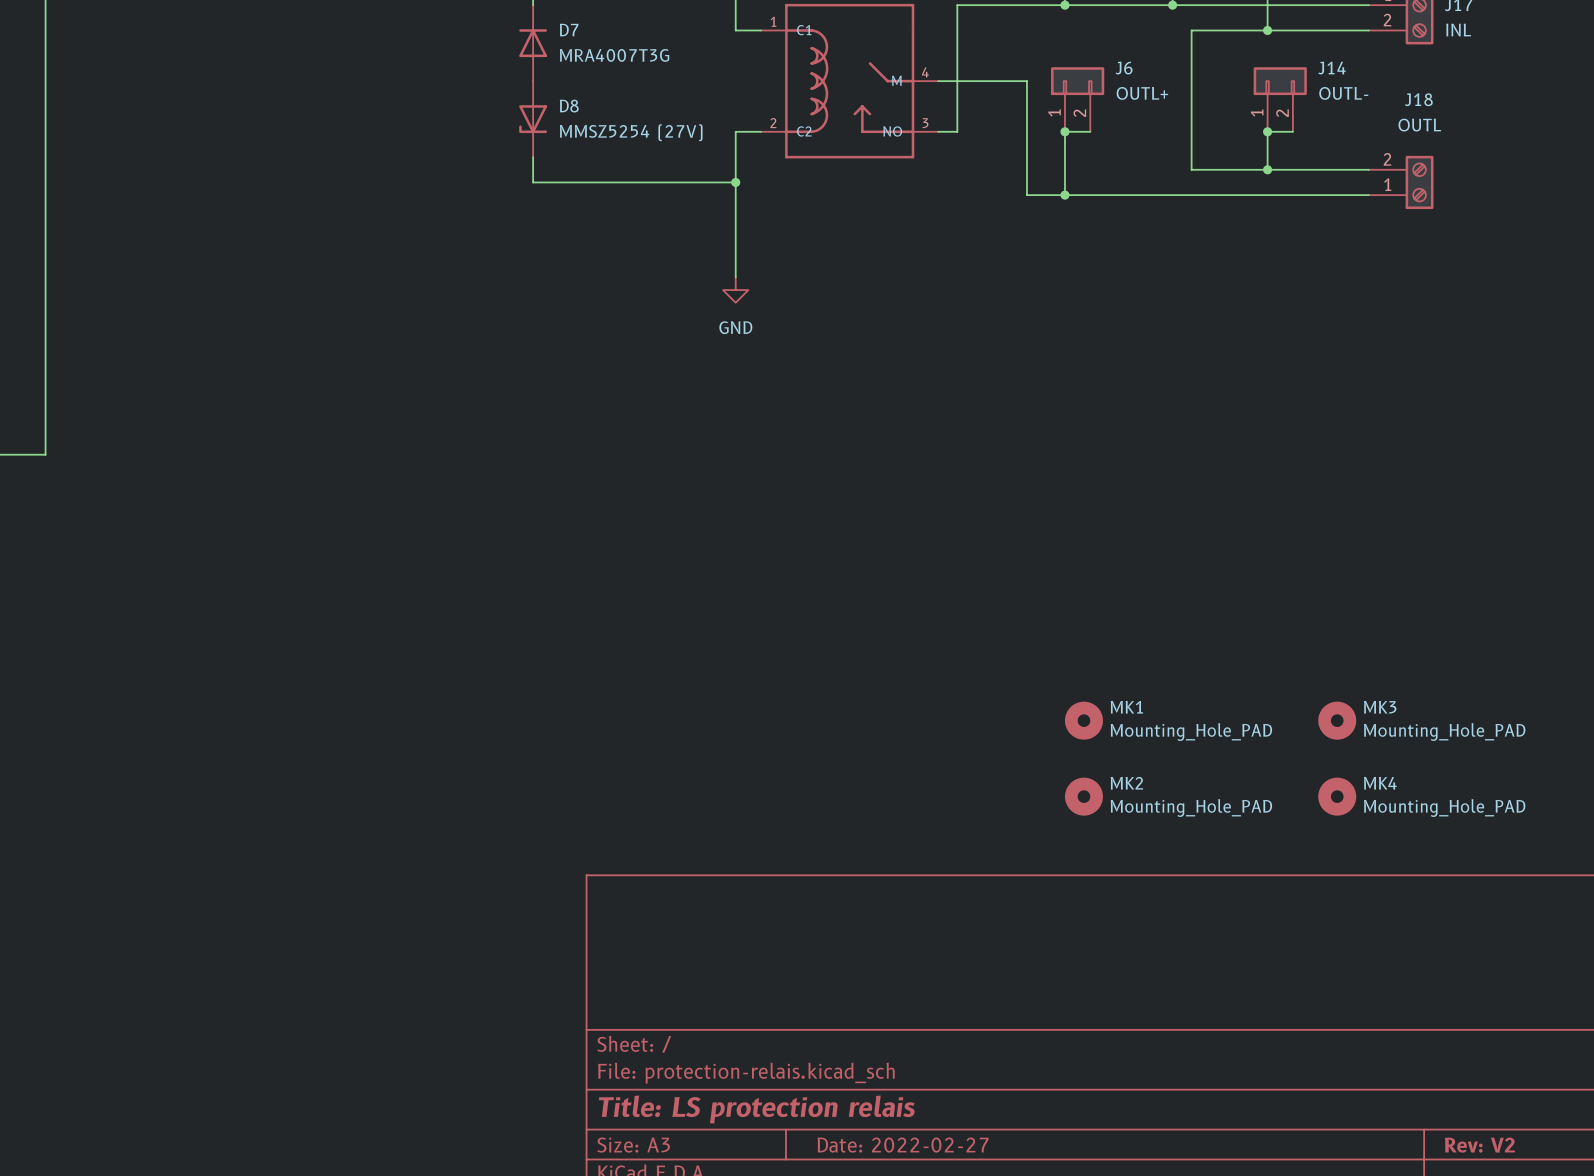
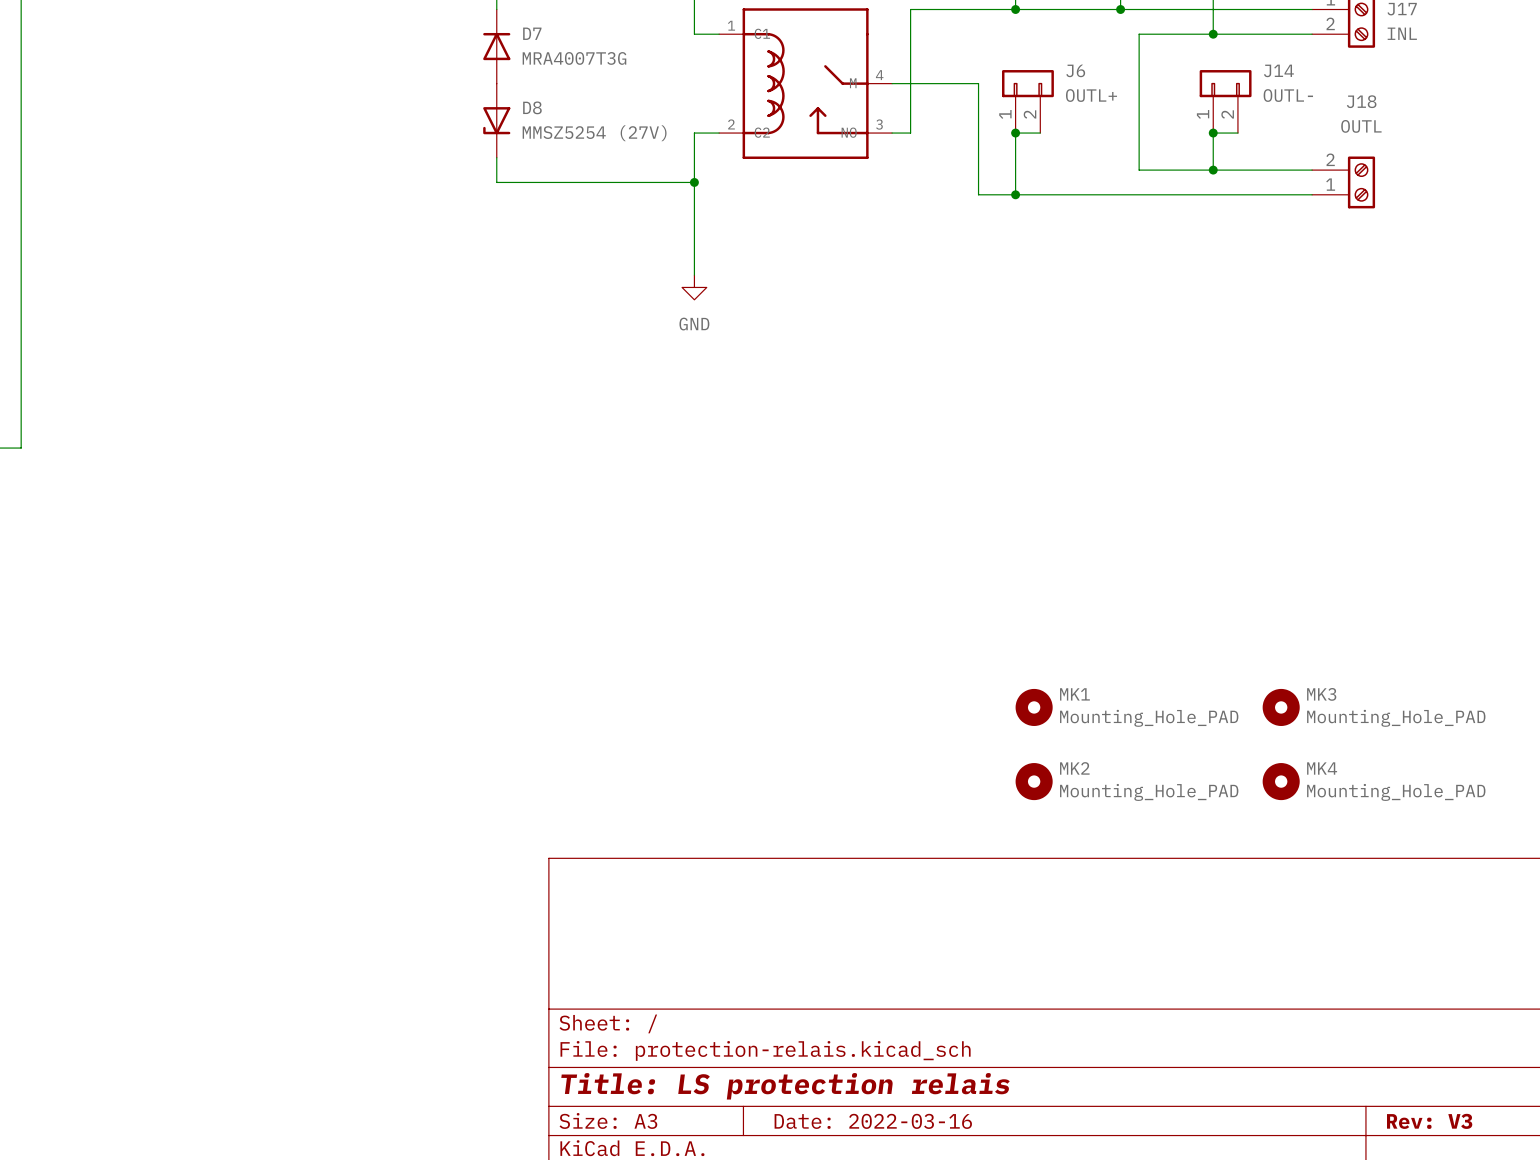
title block: Date: 2022-02-27 (903, 1145) -> Date: 2022-03-16 (873, 1121)
title block: Rev: V2 (1479, 1145) -> Rev: V3 (1429, 1121)

